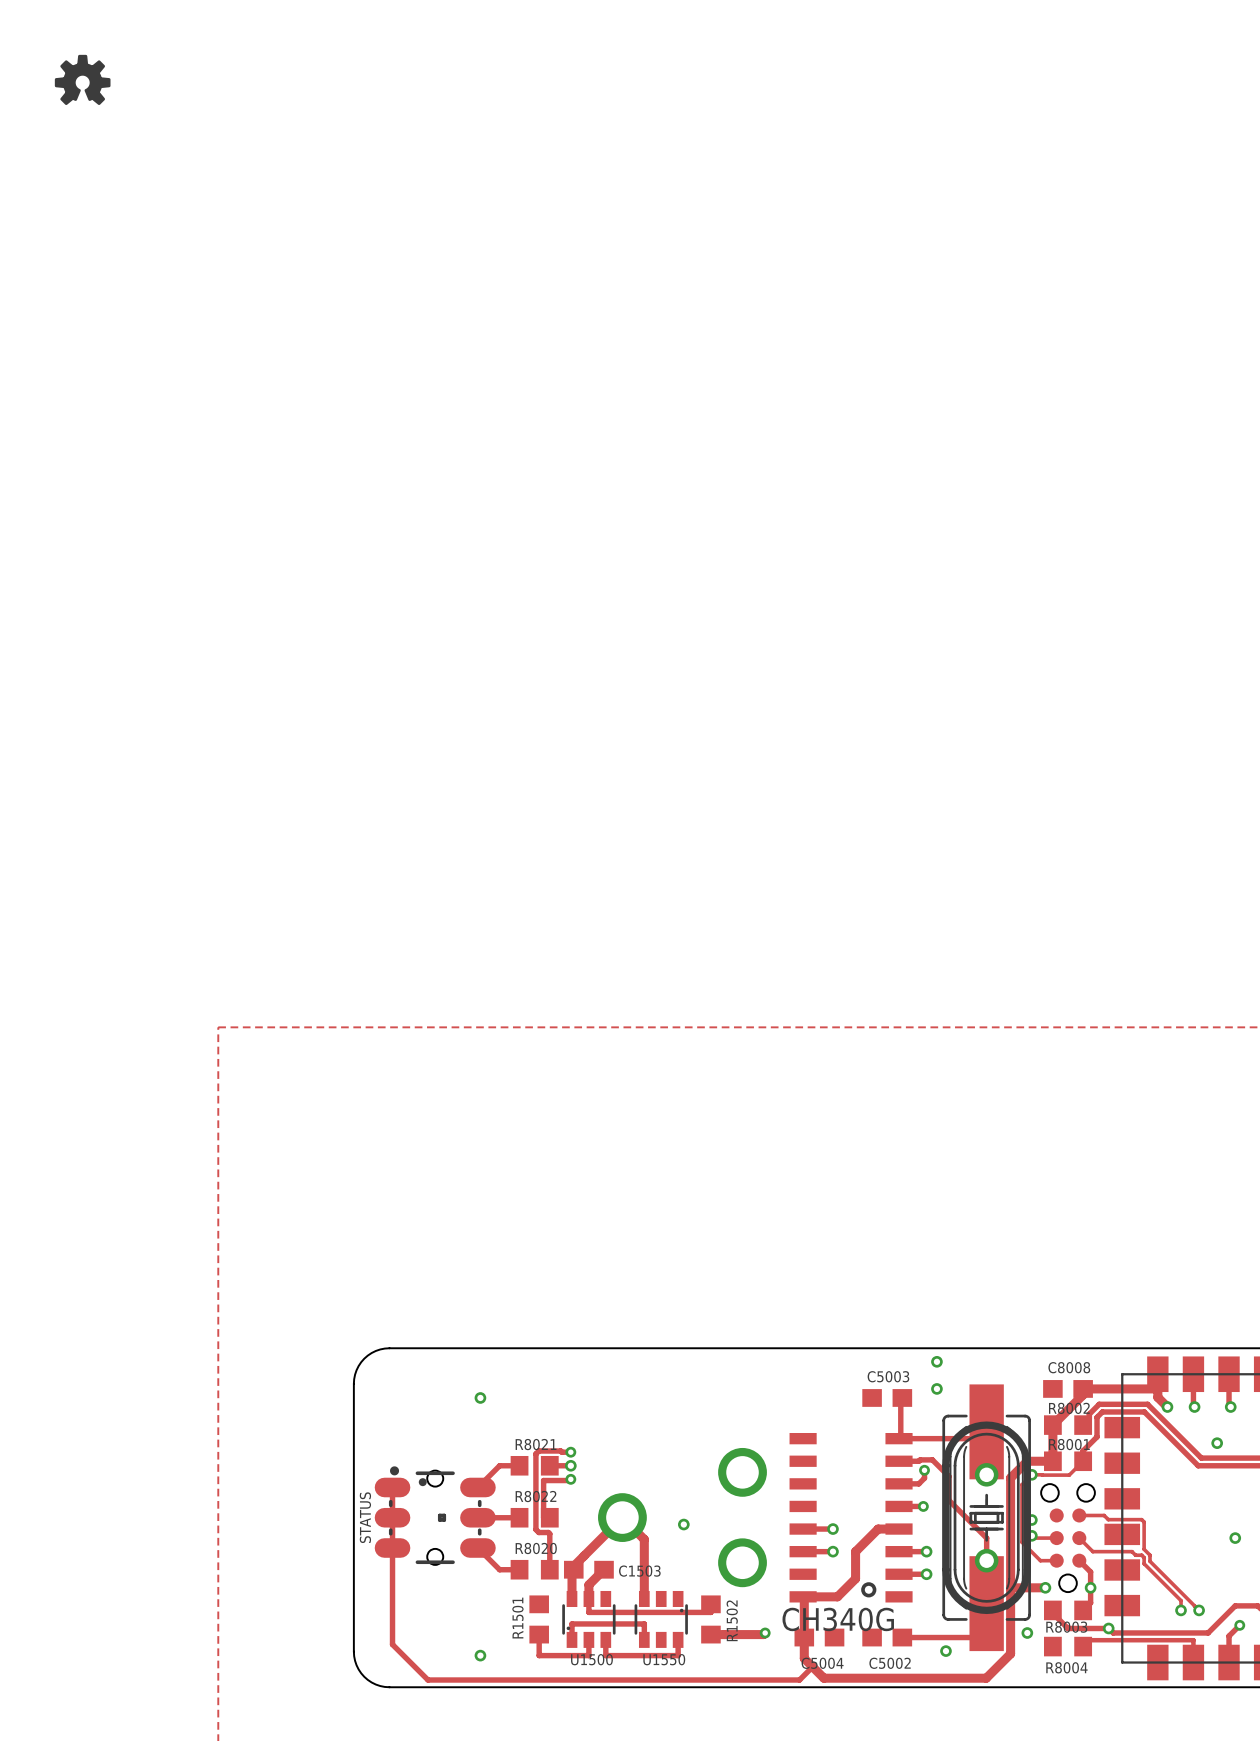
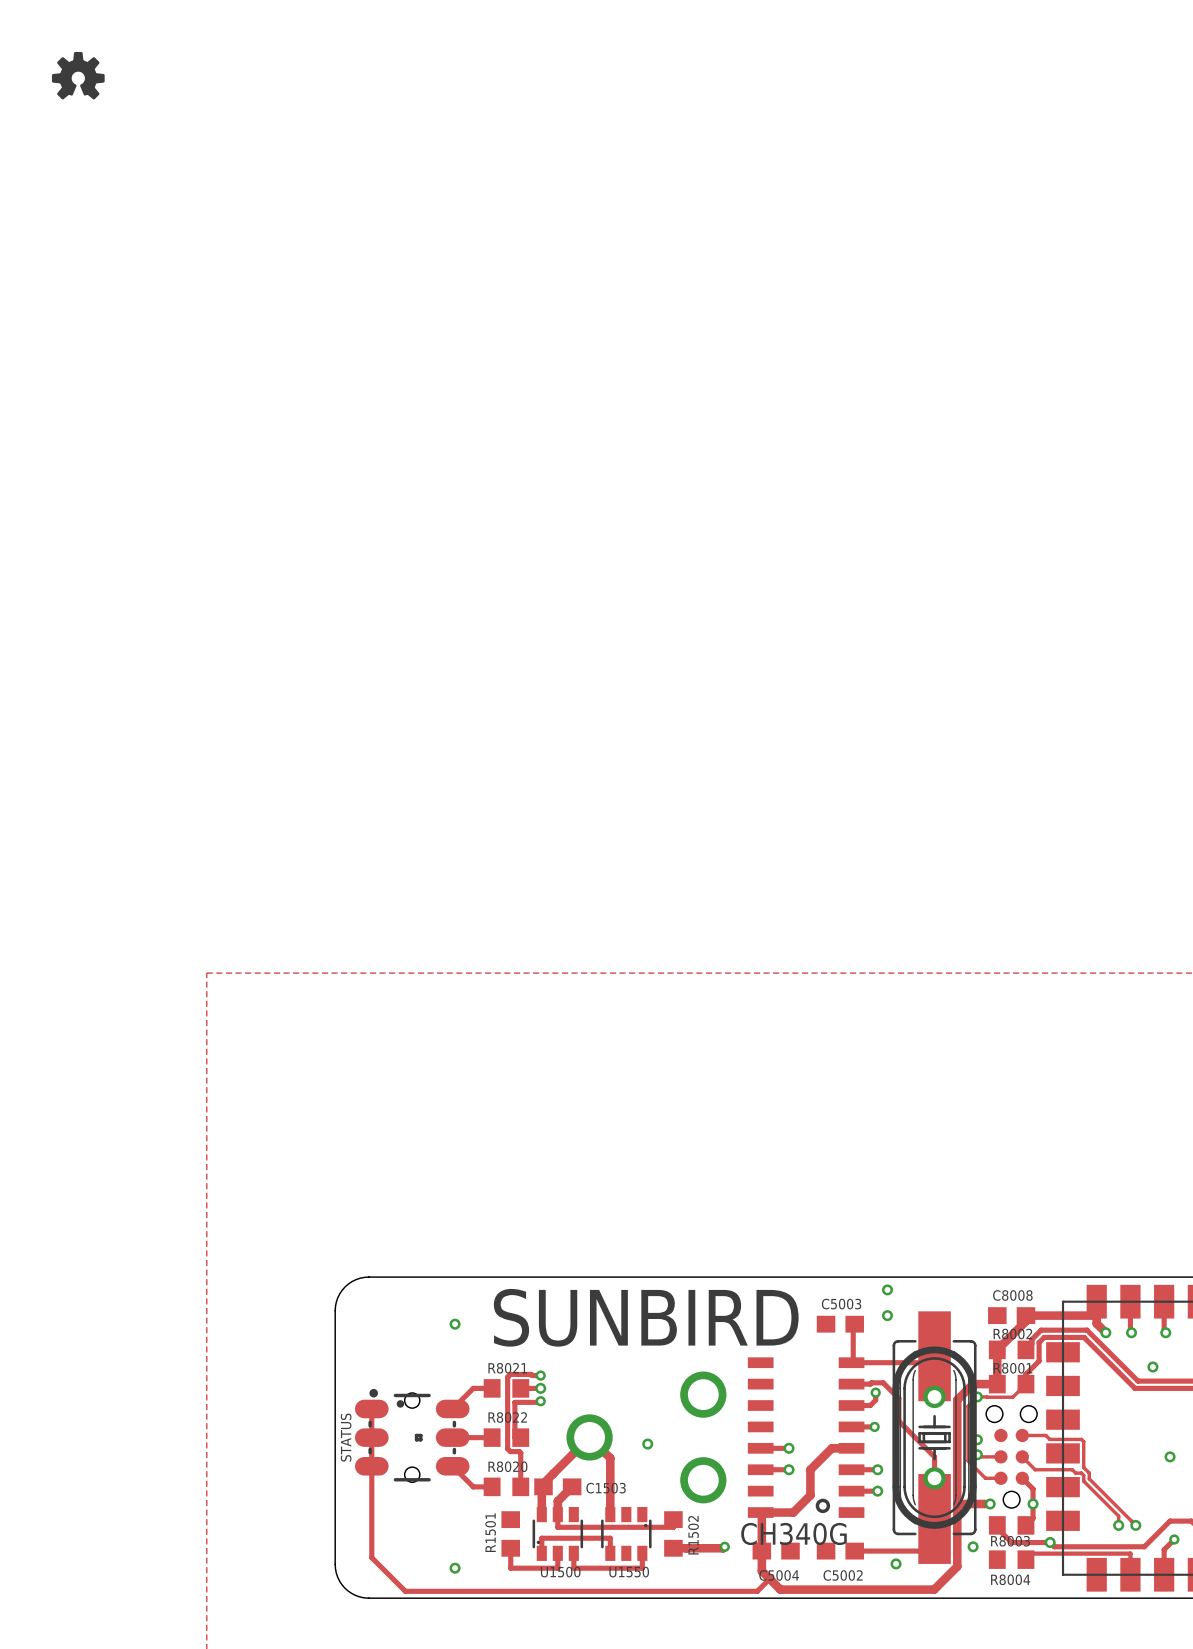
text: none -> SUNBIRD (646, 1317)

